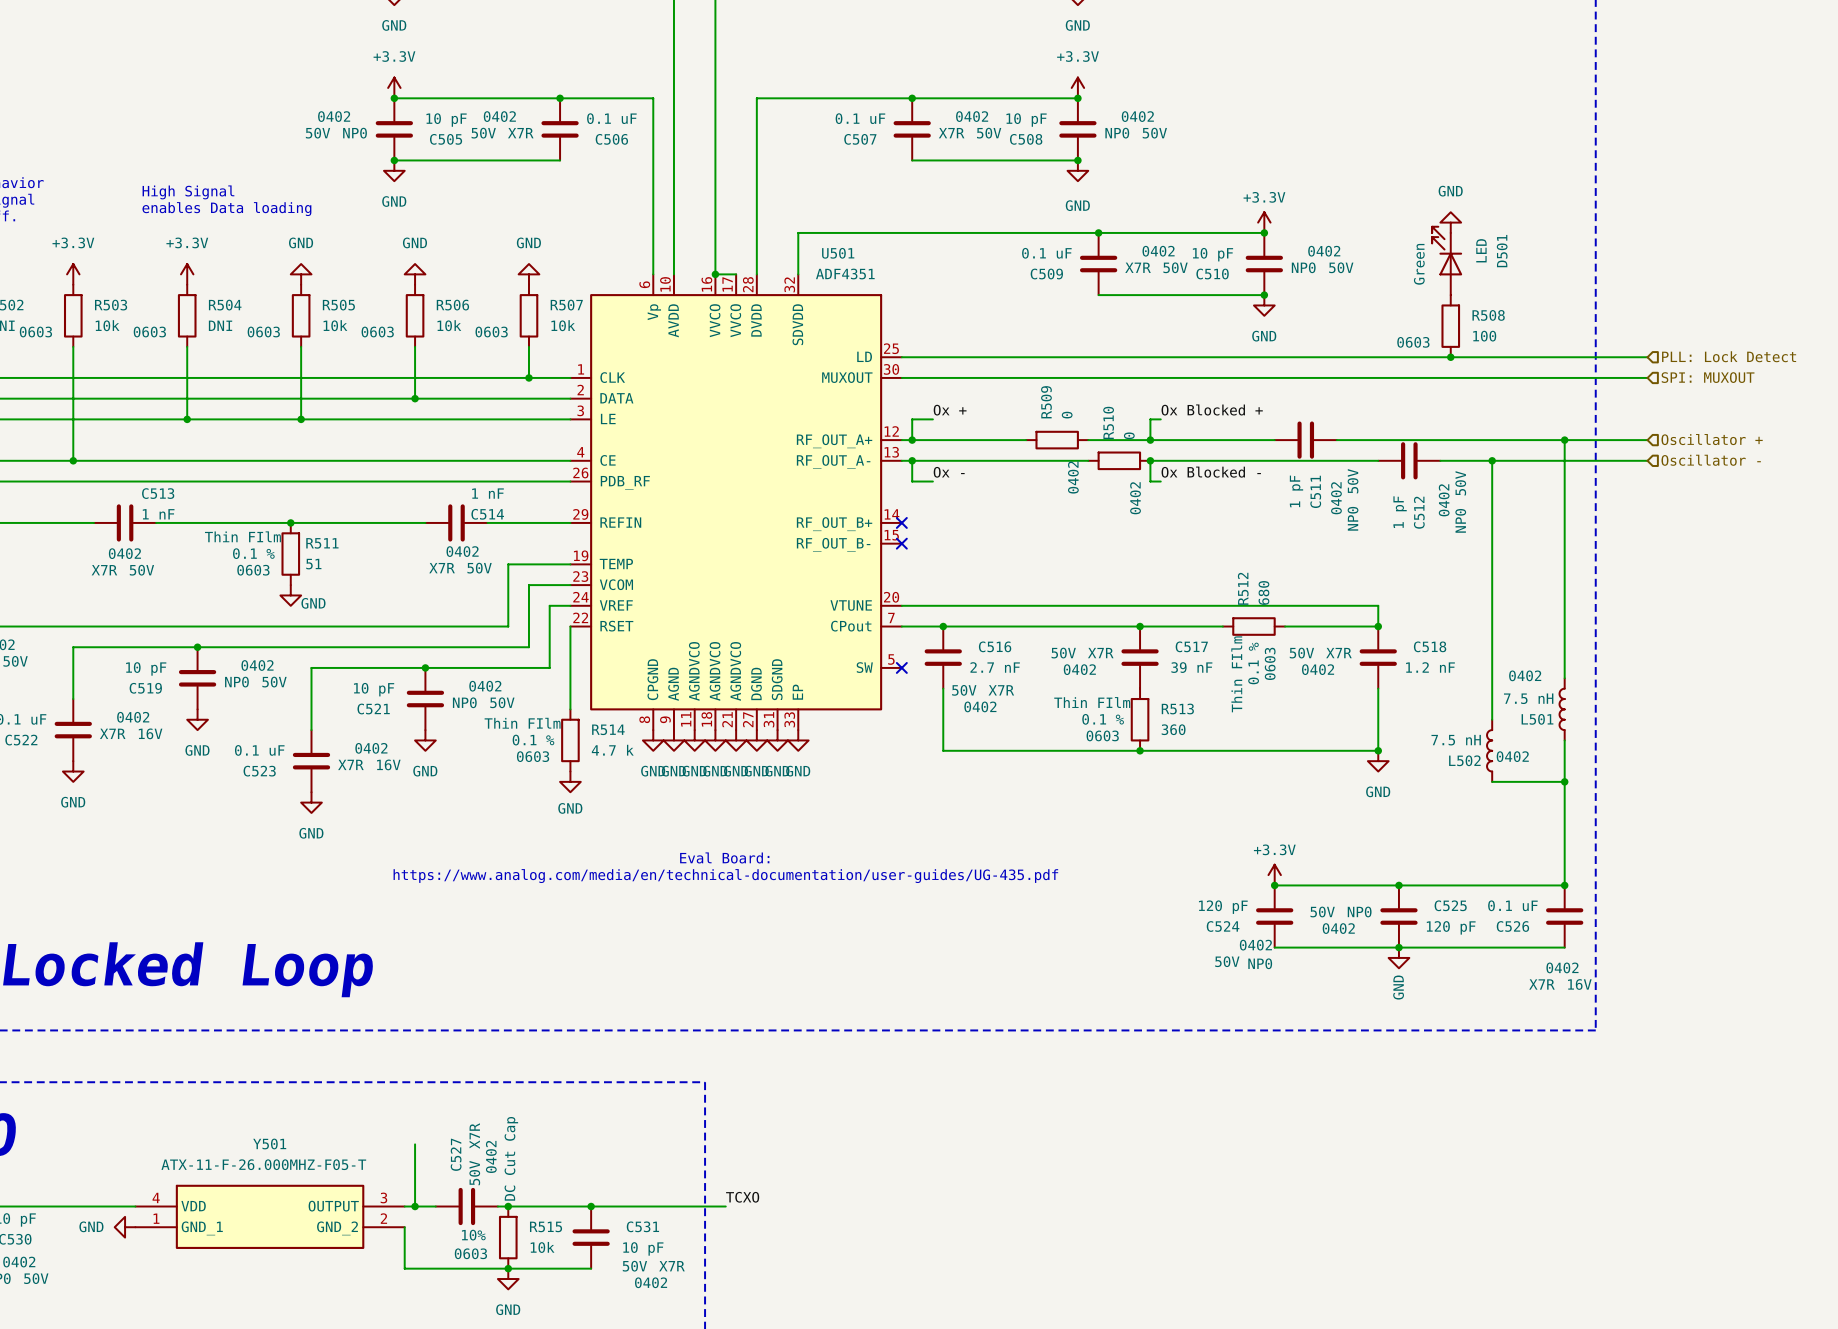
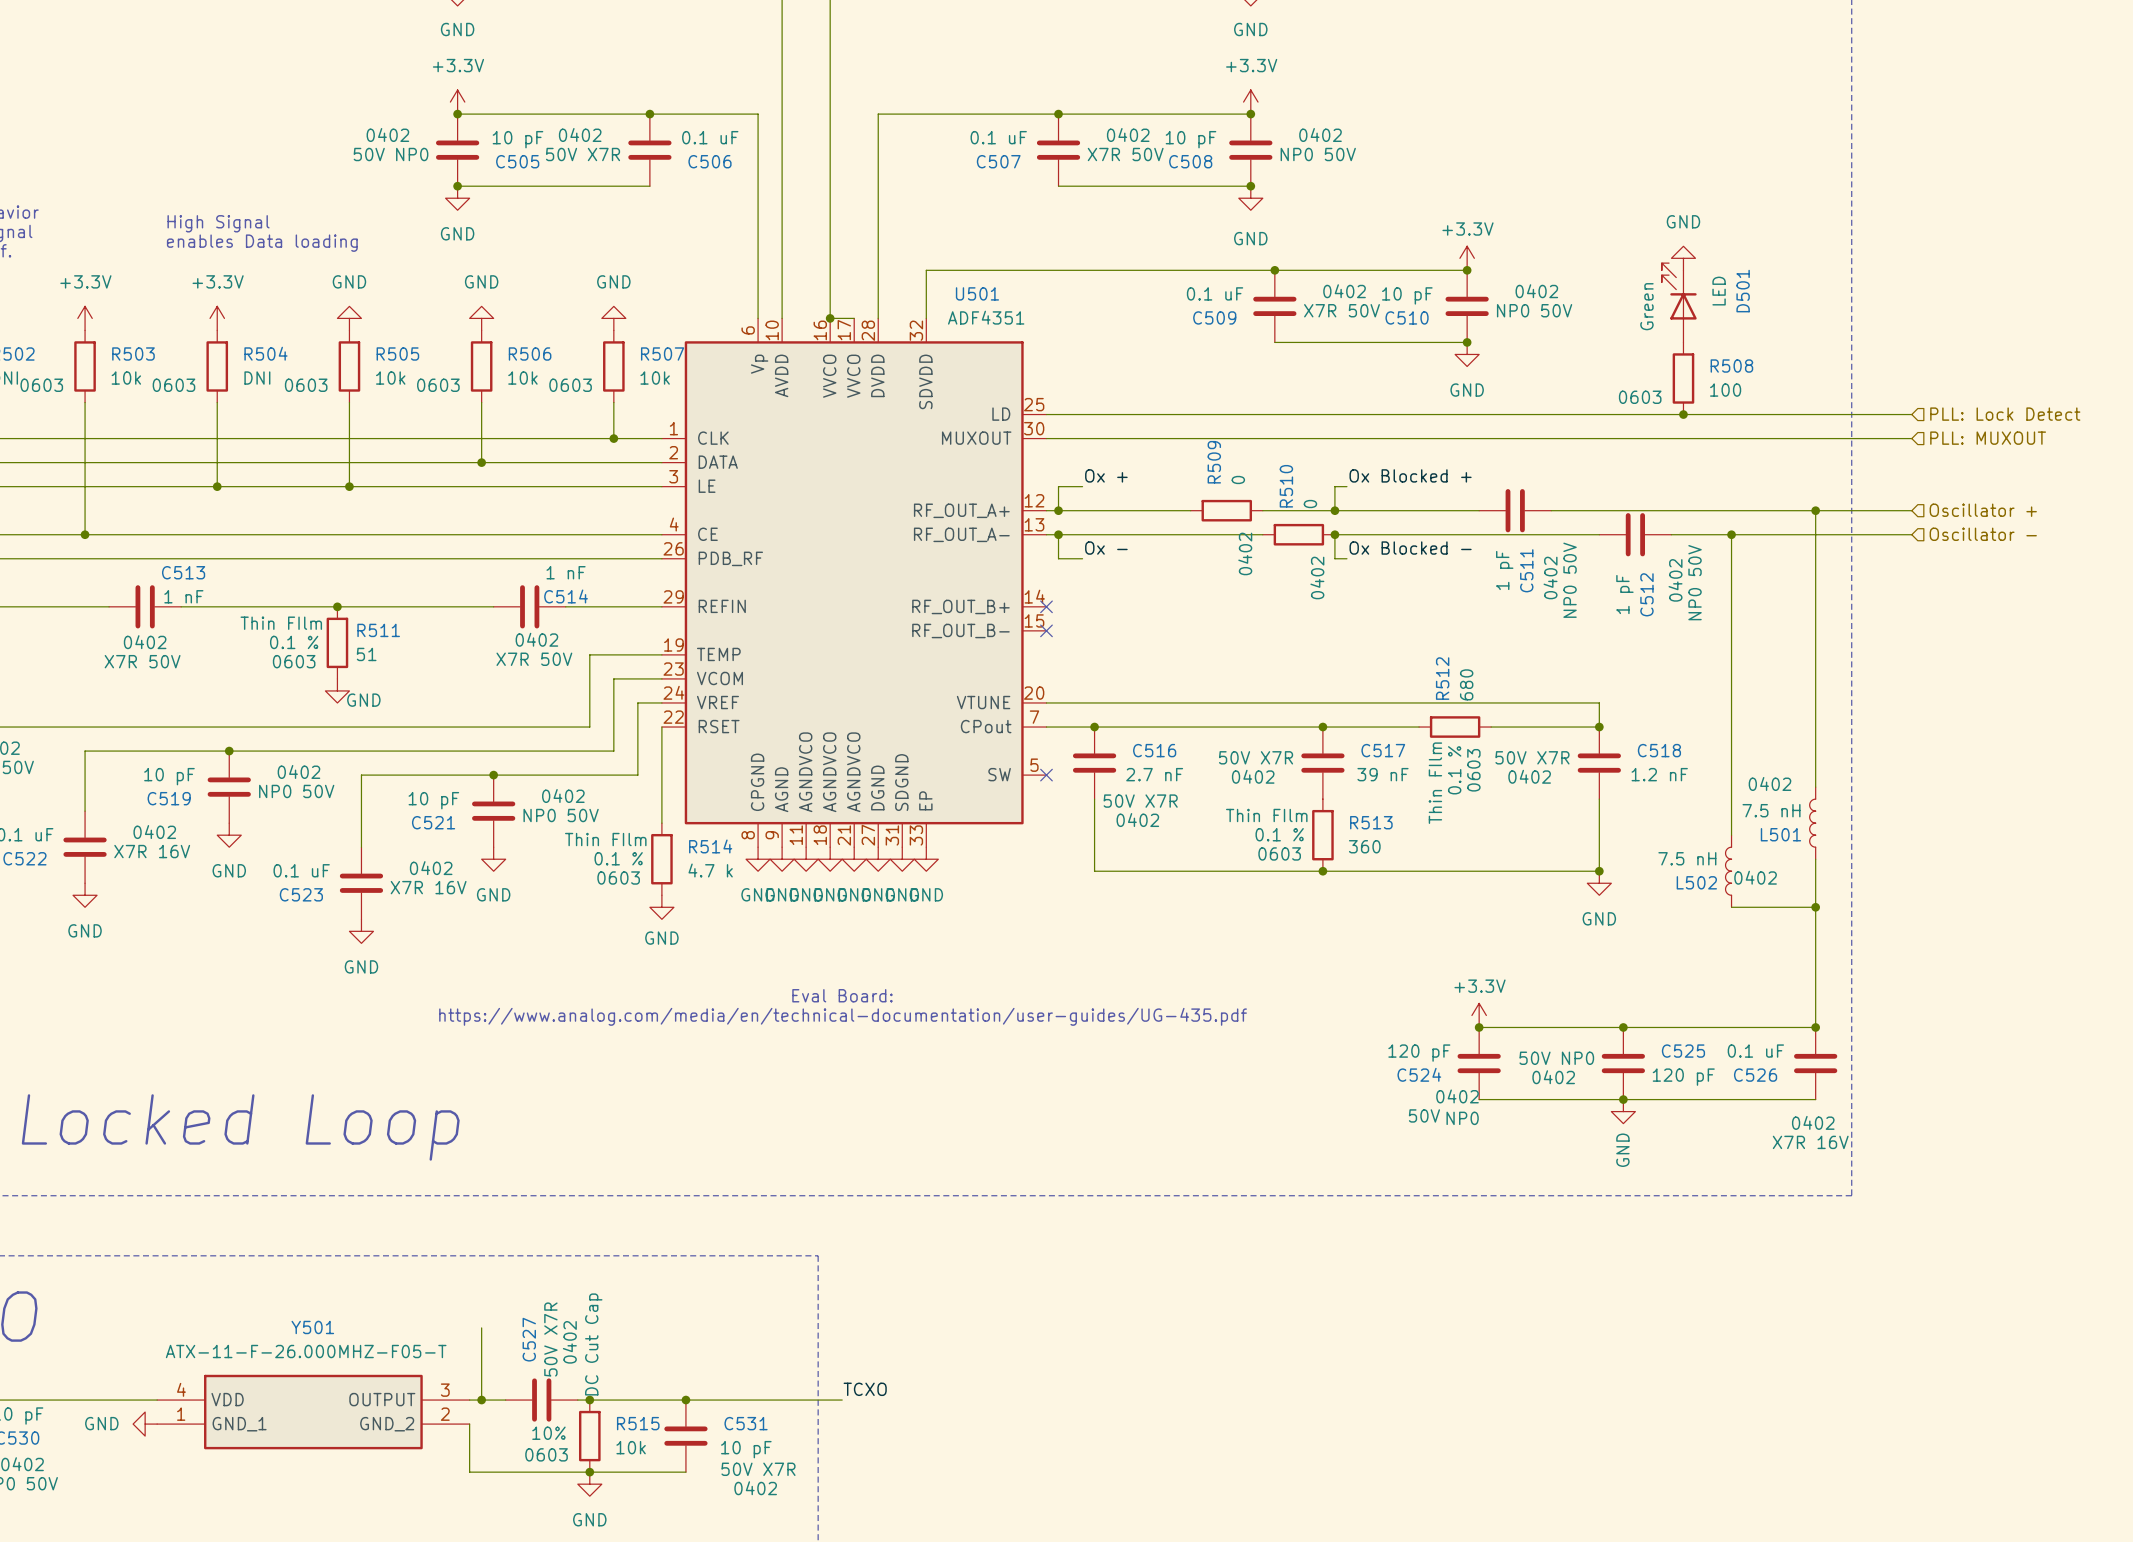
hierarchical label: SPI: MUXOUT (1708, 377) -> PLL: MUXOUT (1988, 438)

